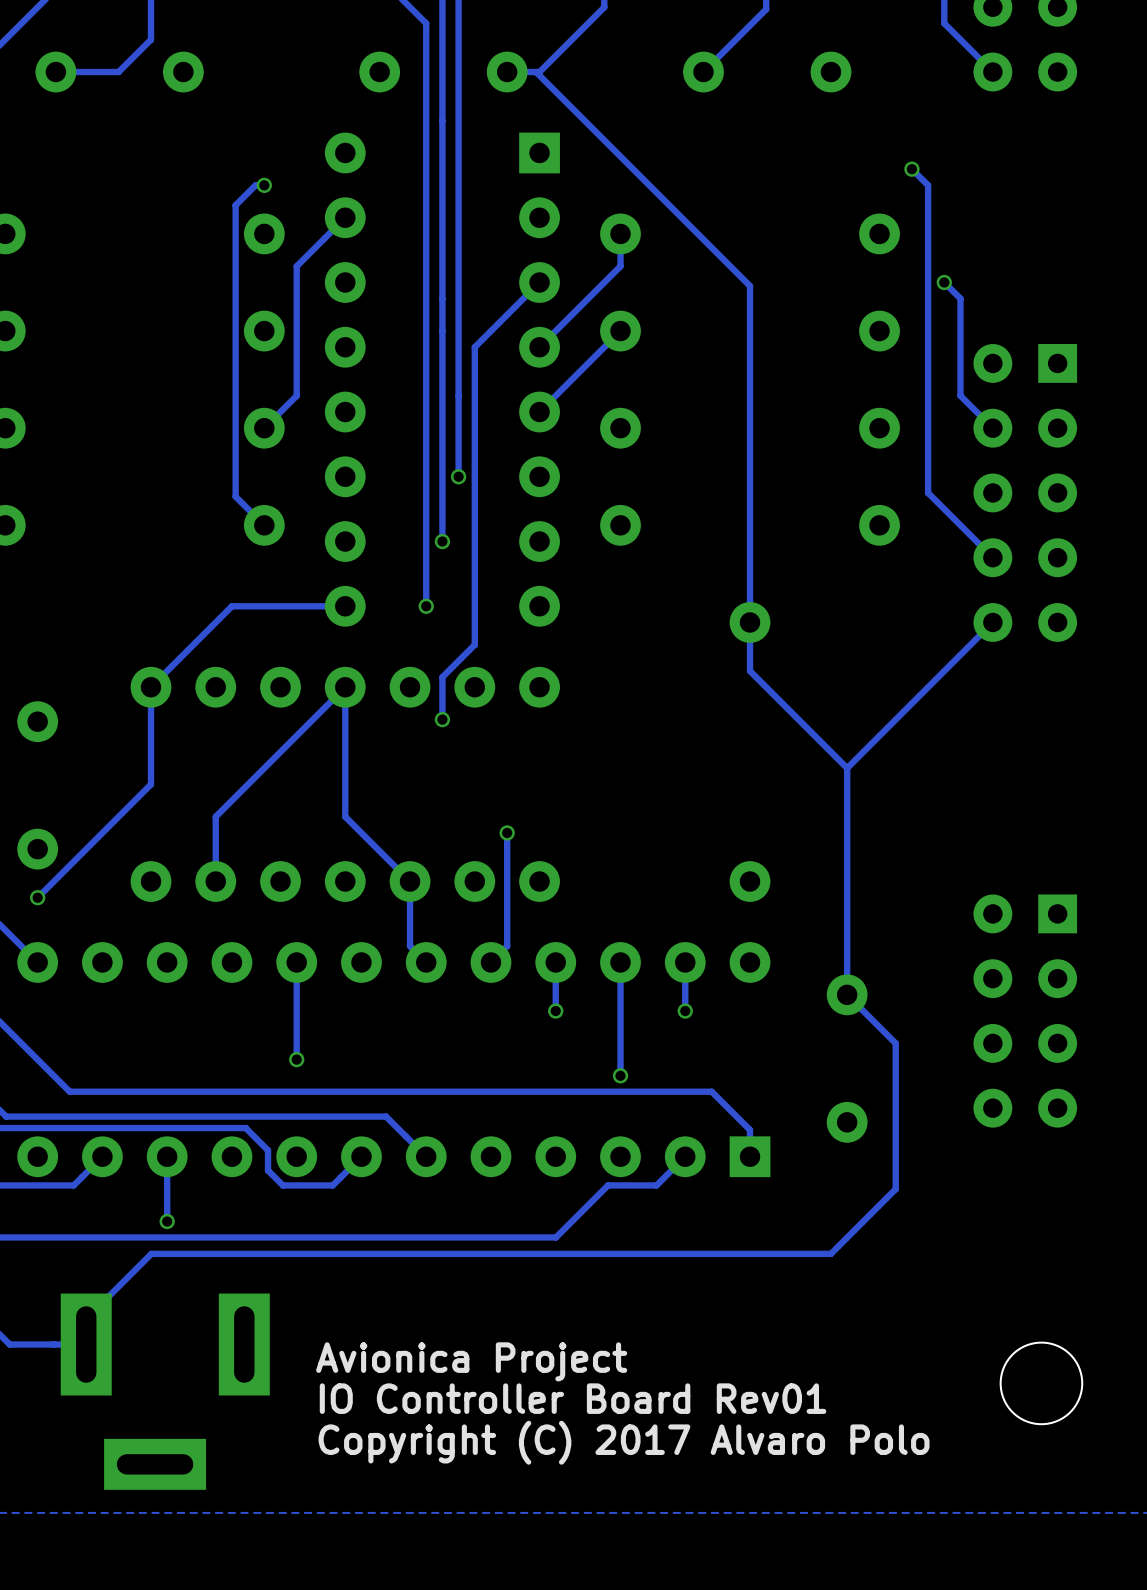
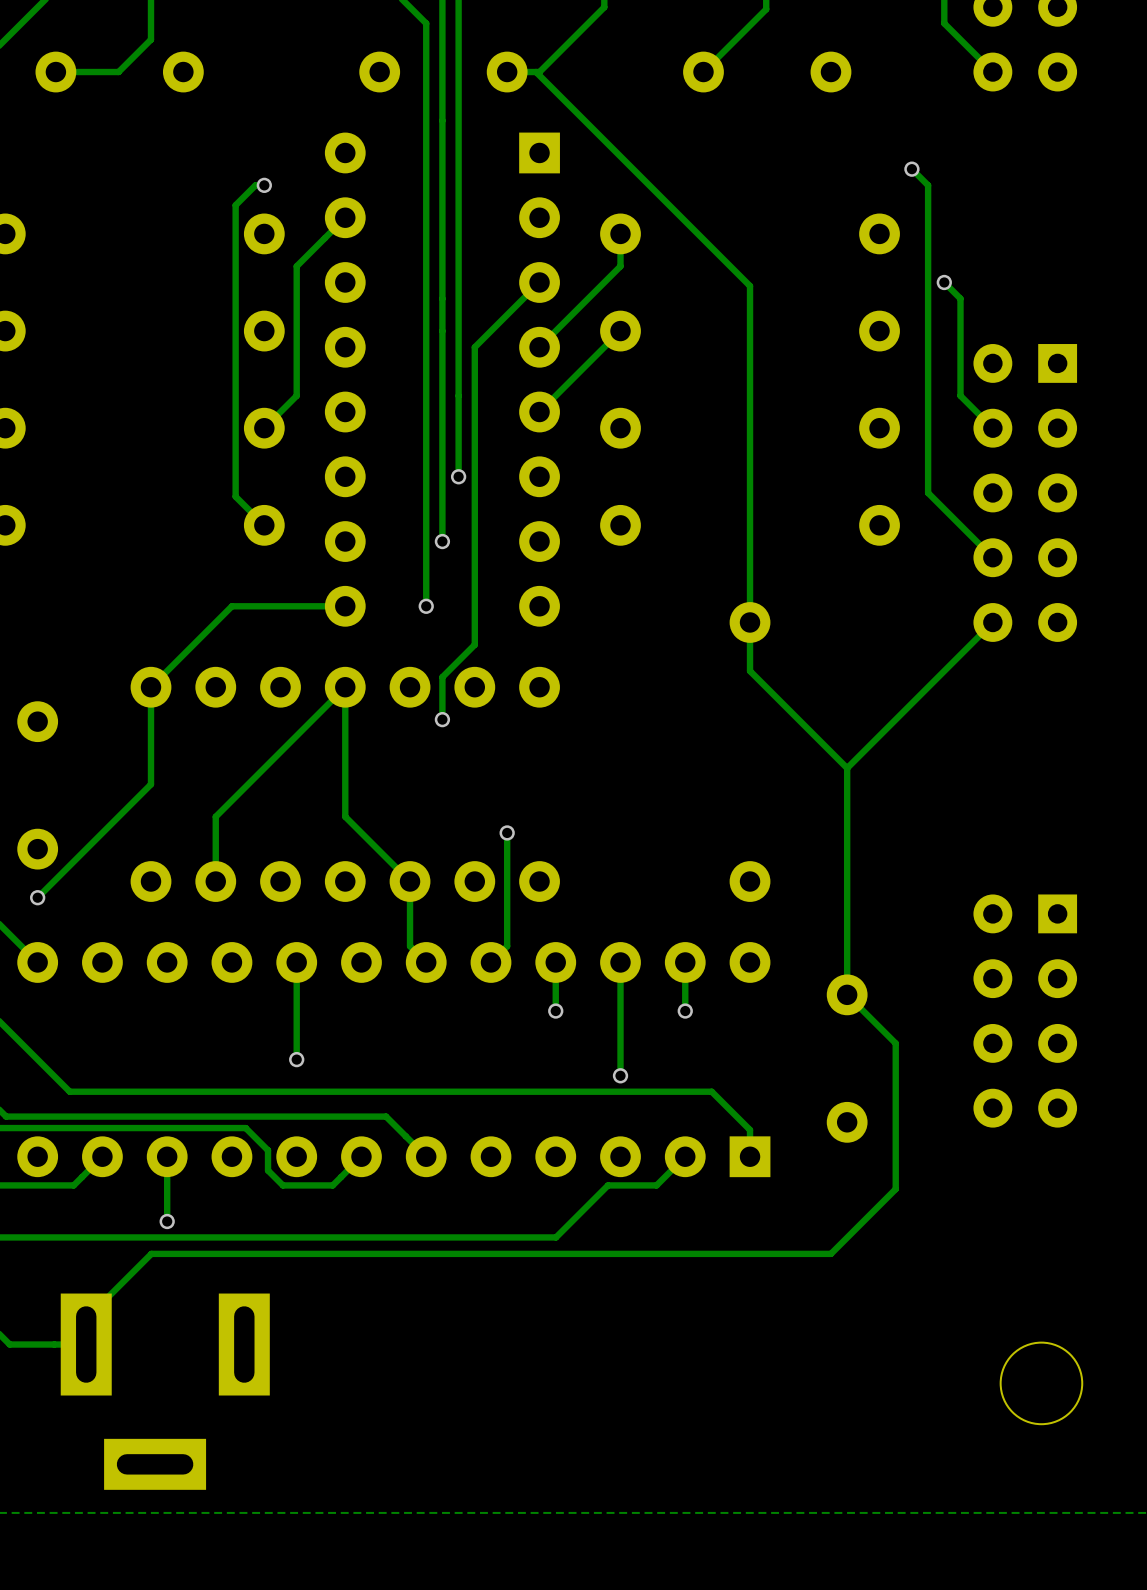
text: Avionica Project (471, 1361) -> none
text: IO Controller Board Rev01 (573, 1398) -> none
text: Copyright (C) 2017 Alvaro Polo (624, 1442) -> none

